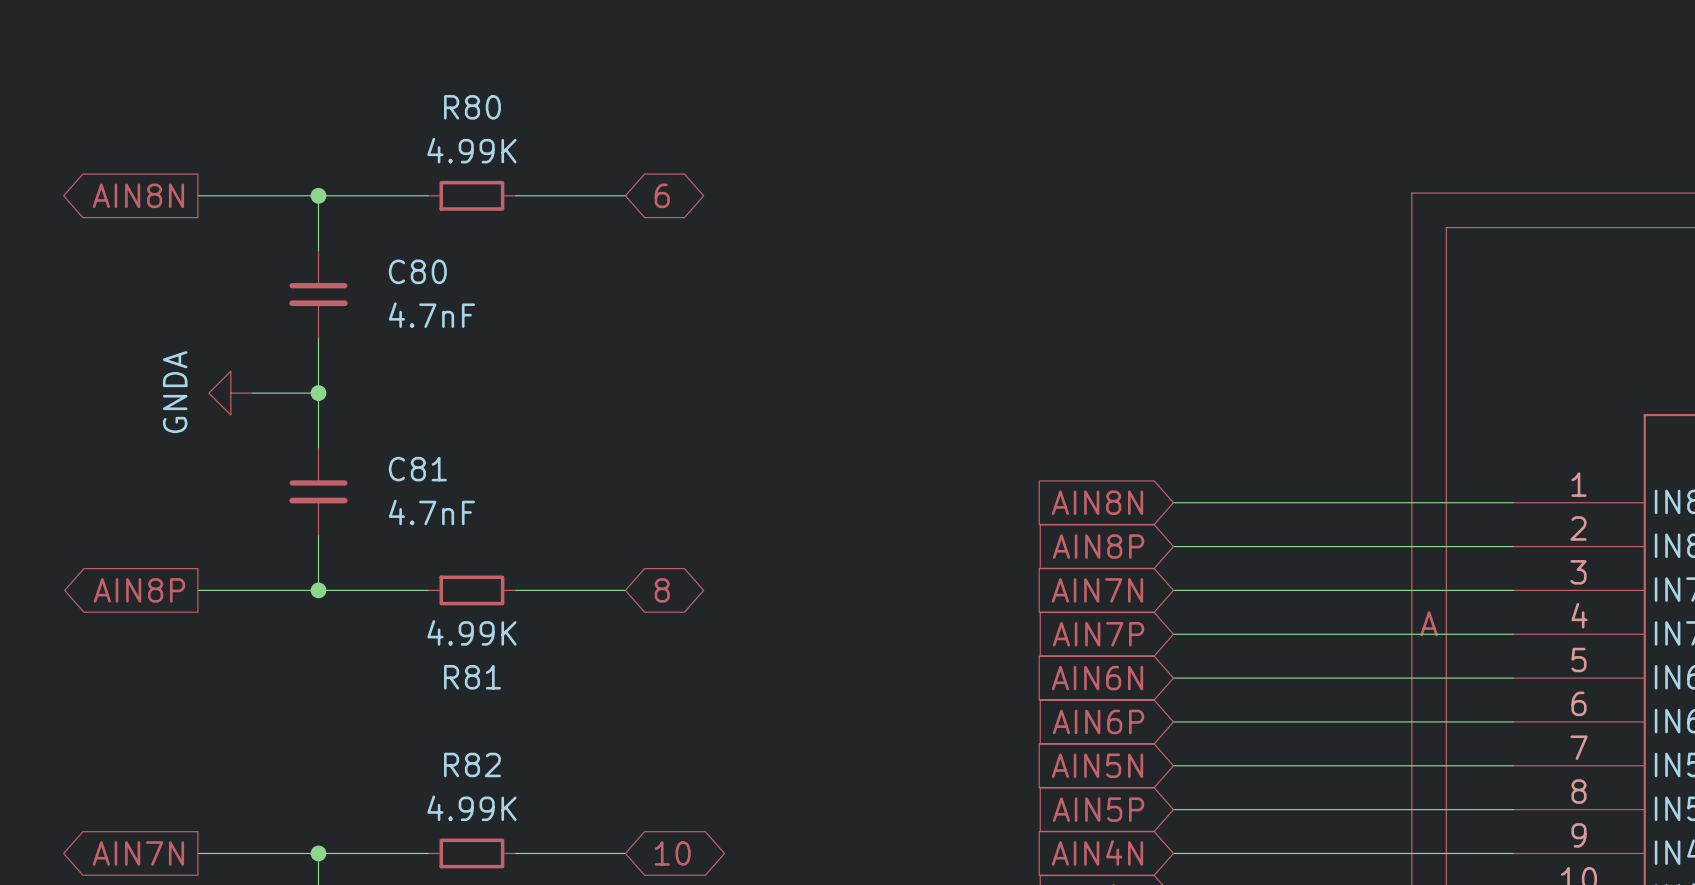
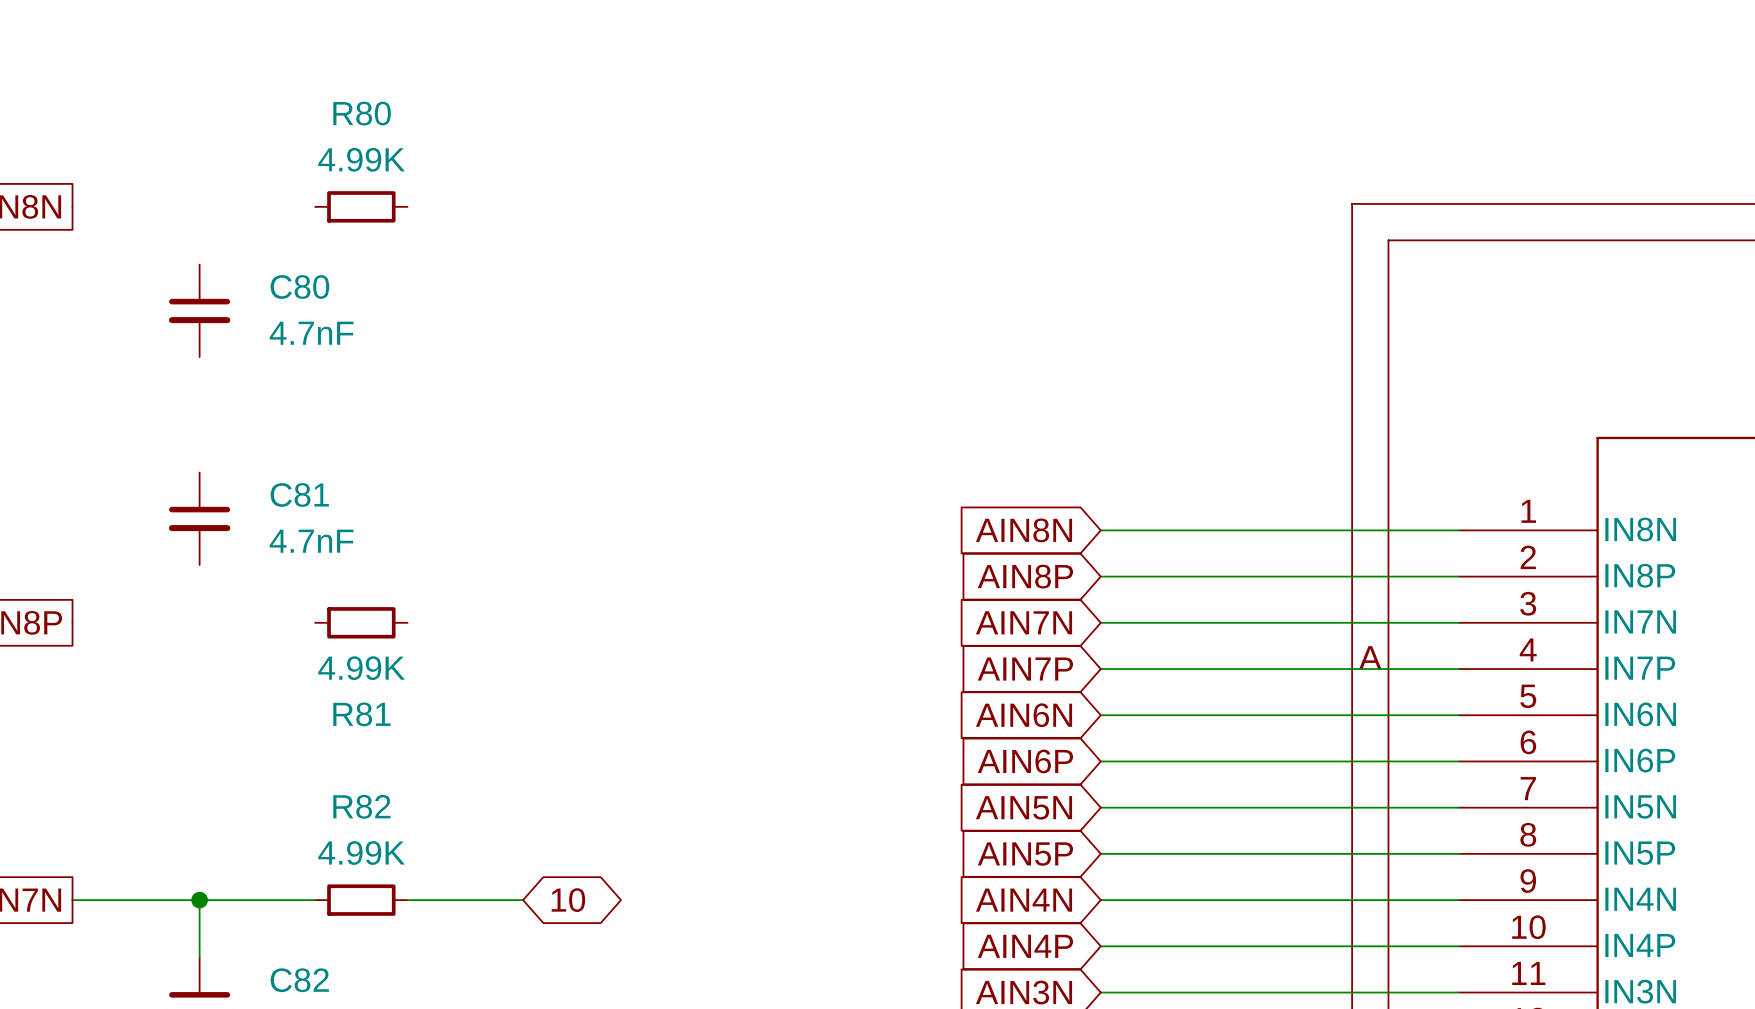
wire: (197, 195) (428, 195) -> none
wire: (318, 195) (318, 250) -> none
junction: (318, 195) -> none
wire: (515, 195) (625, 195) -> none
global label: 6 (662, 195) -> none
wire: (318, 338) (318, 447) -> none
power symbol: GNDA (230, 393) -> none
wire: (252, 393) (318, 393) -> none
junction: (318, 393) -> none
wire: (318, 535) (318, 590) -> none
wire: (197, 590) (428, 590) -> none
junction: (318, 590) -> none
wire: (515, 590) (625, 590) -> none
global label: 8 (662, 590) -> none

